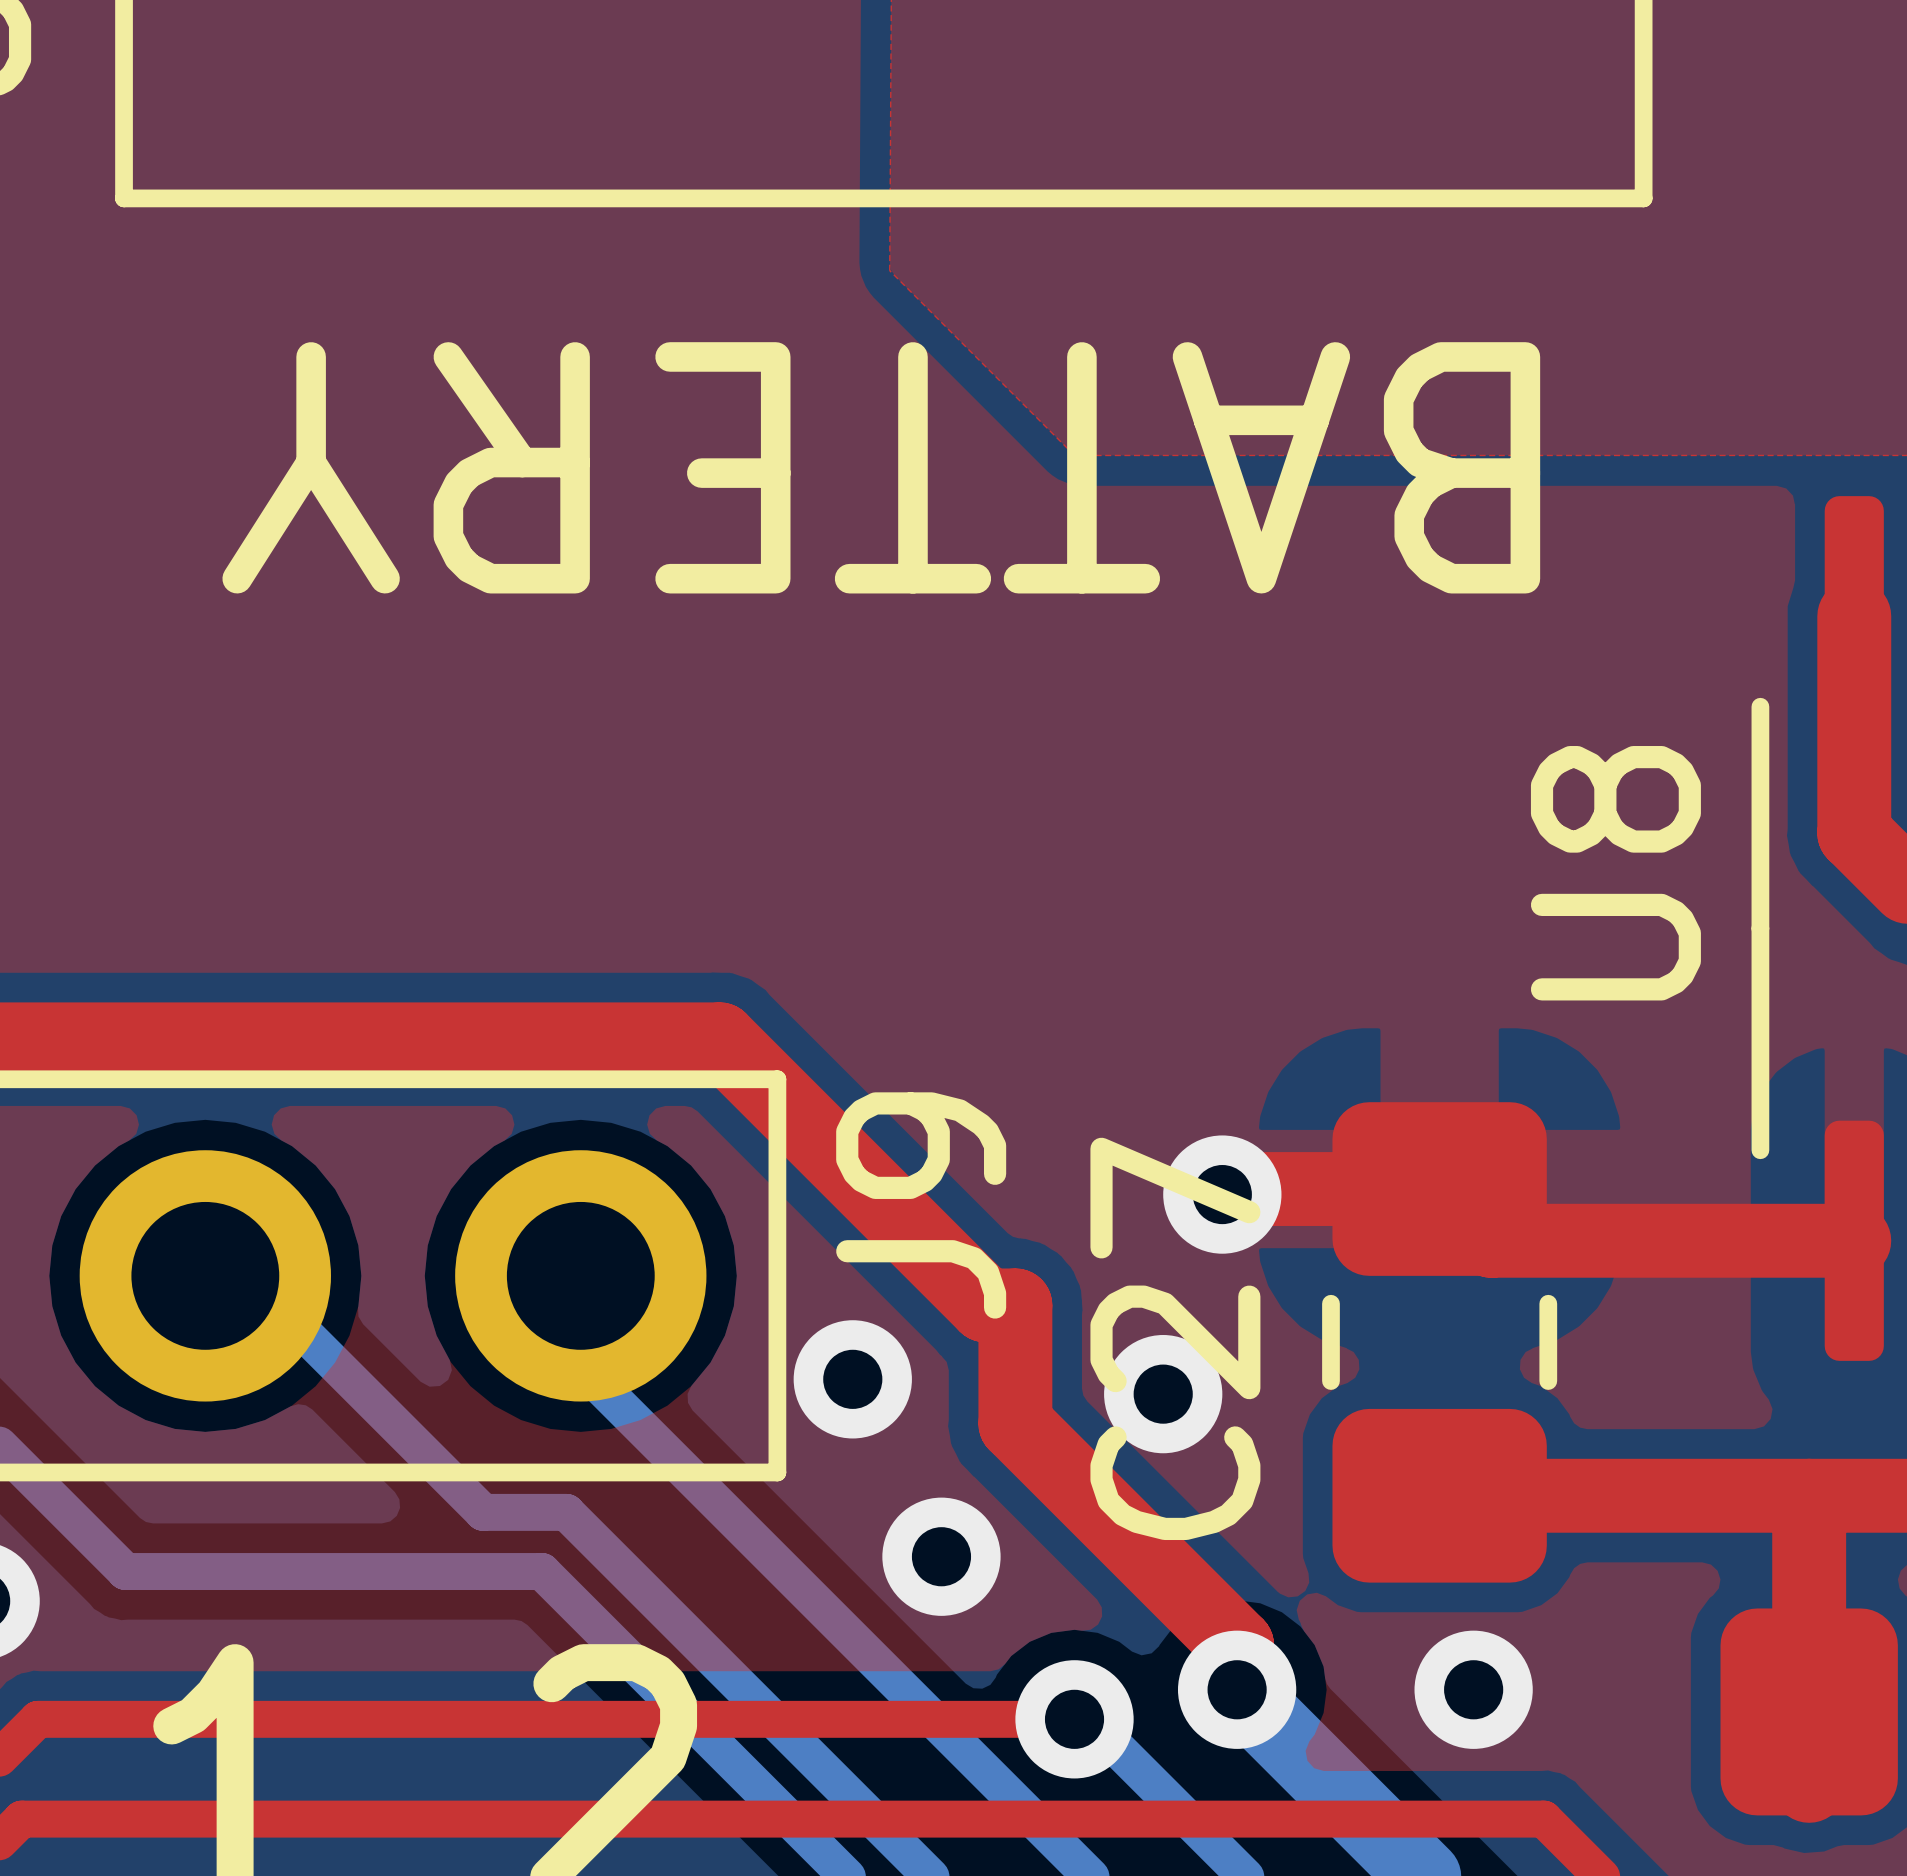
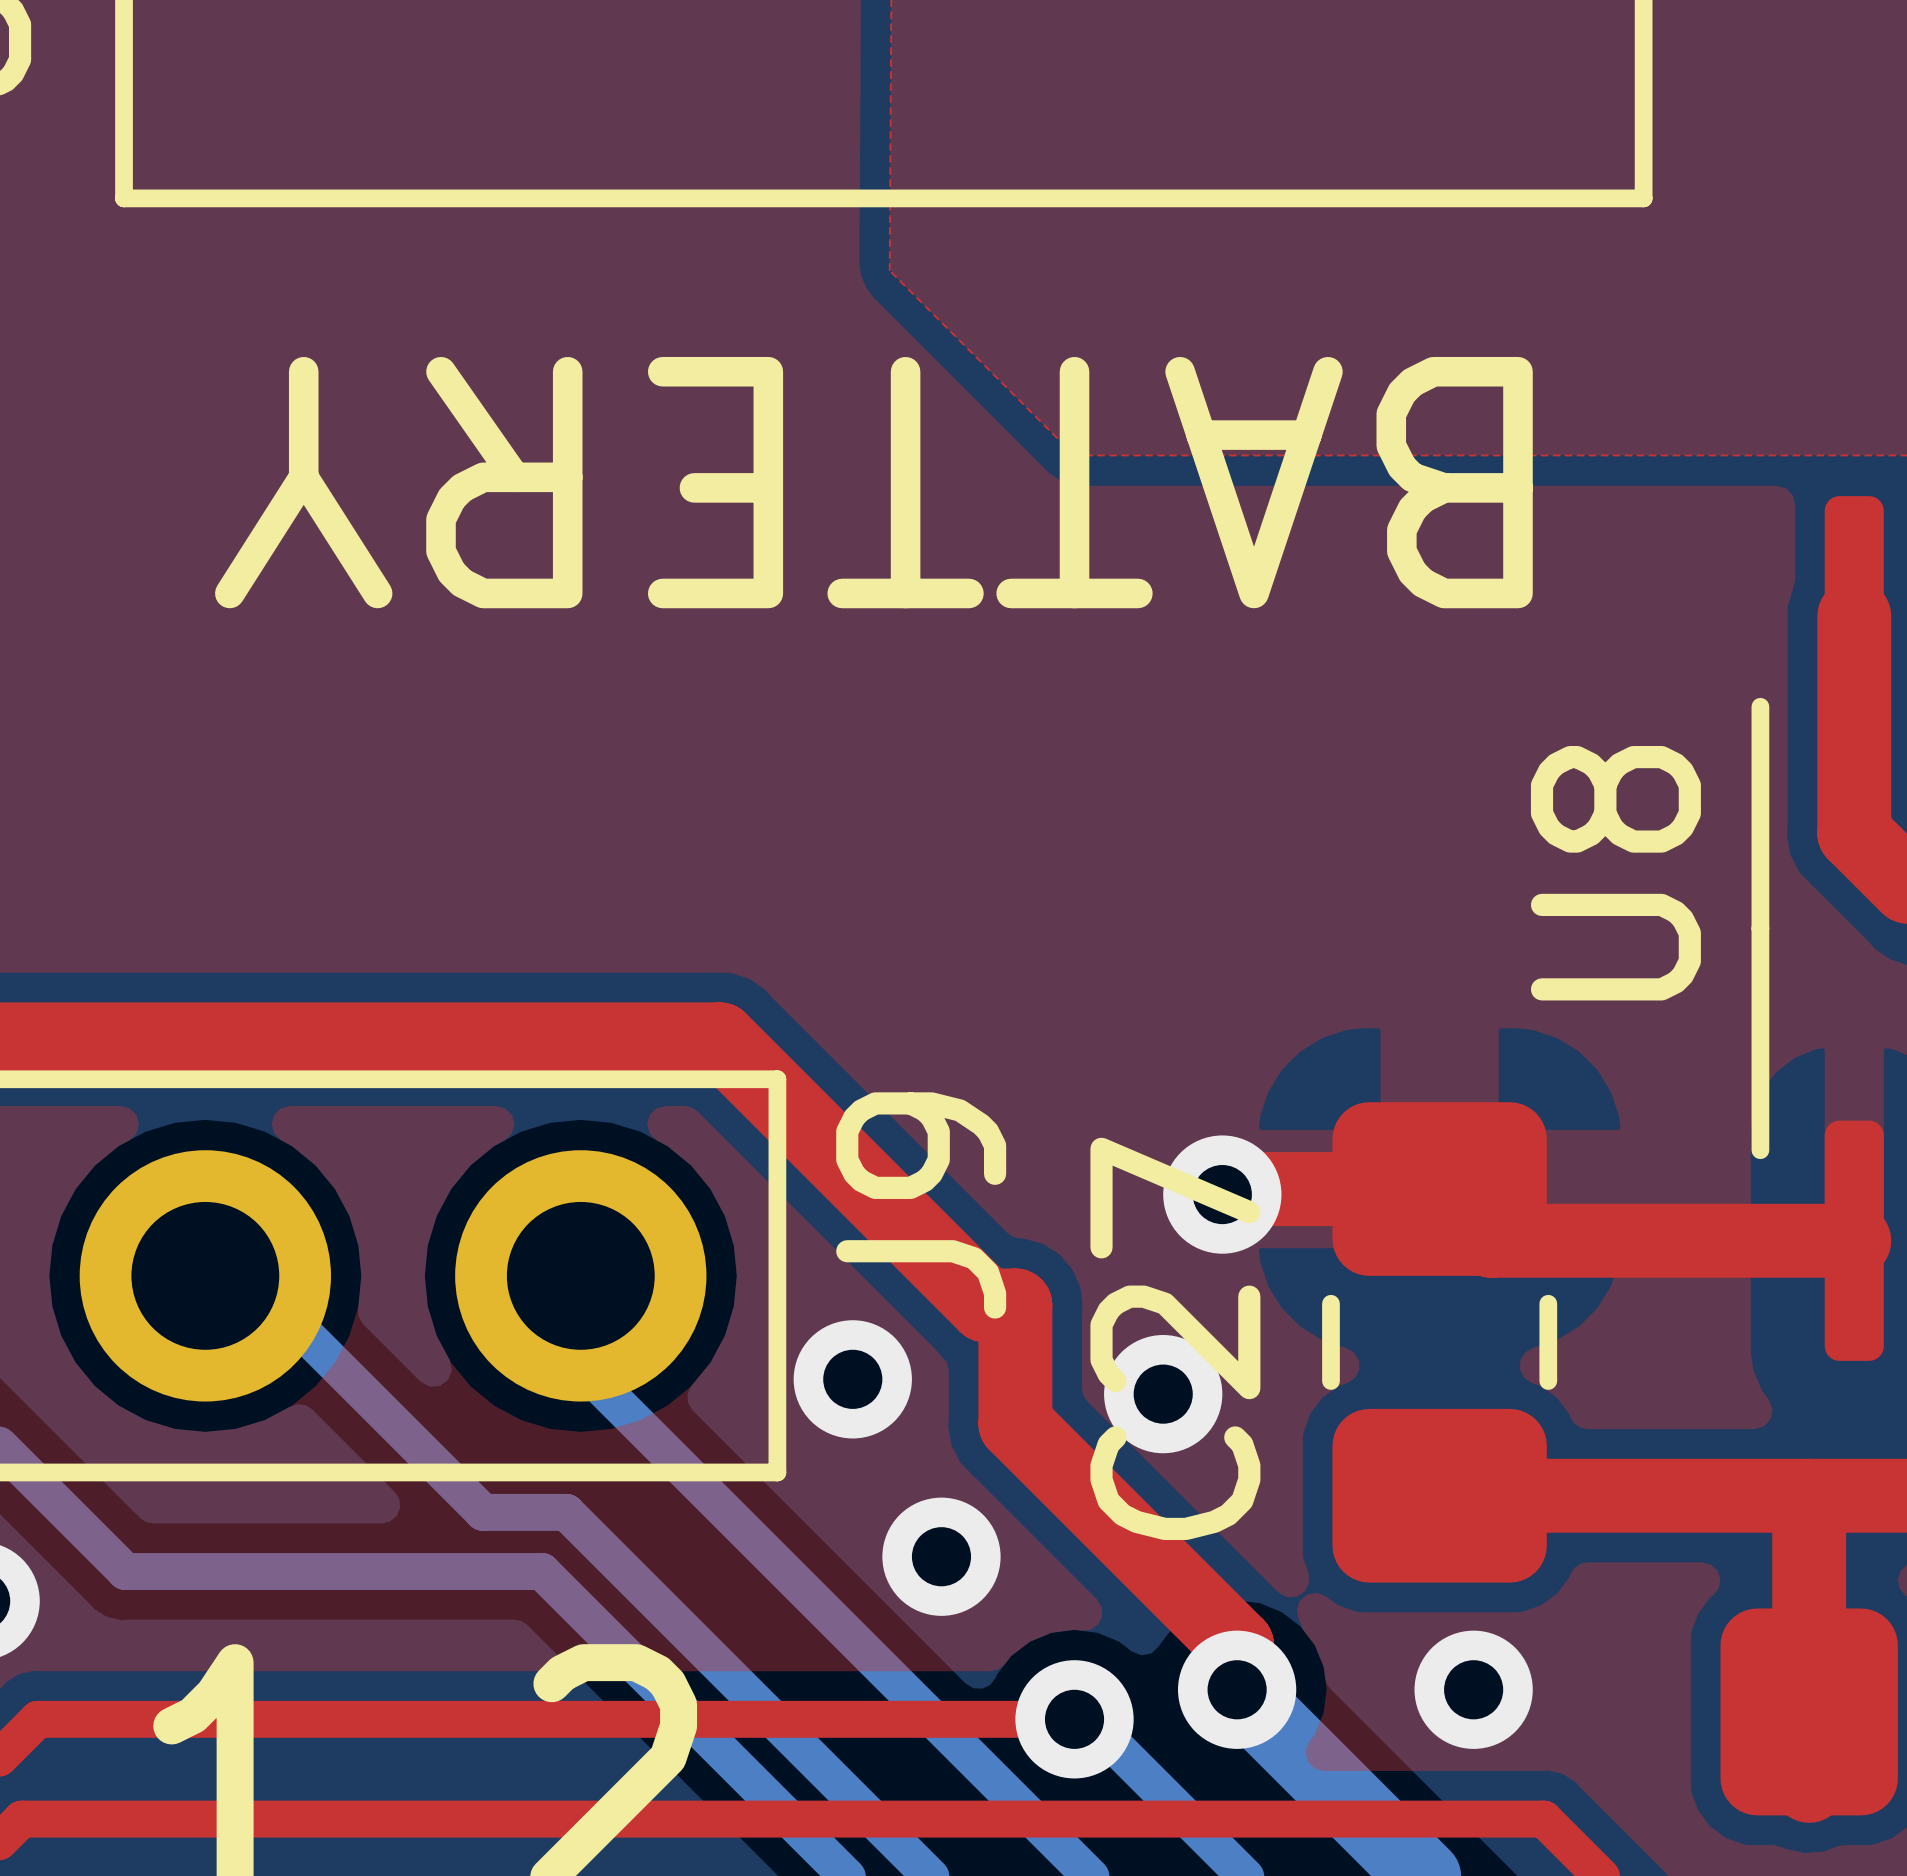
text position: BATTERY (881, 467) -> BATTERY (873, 482)

